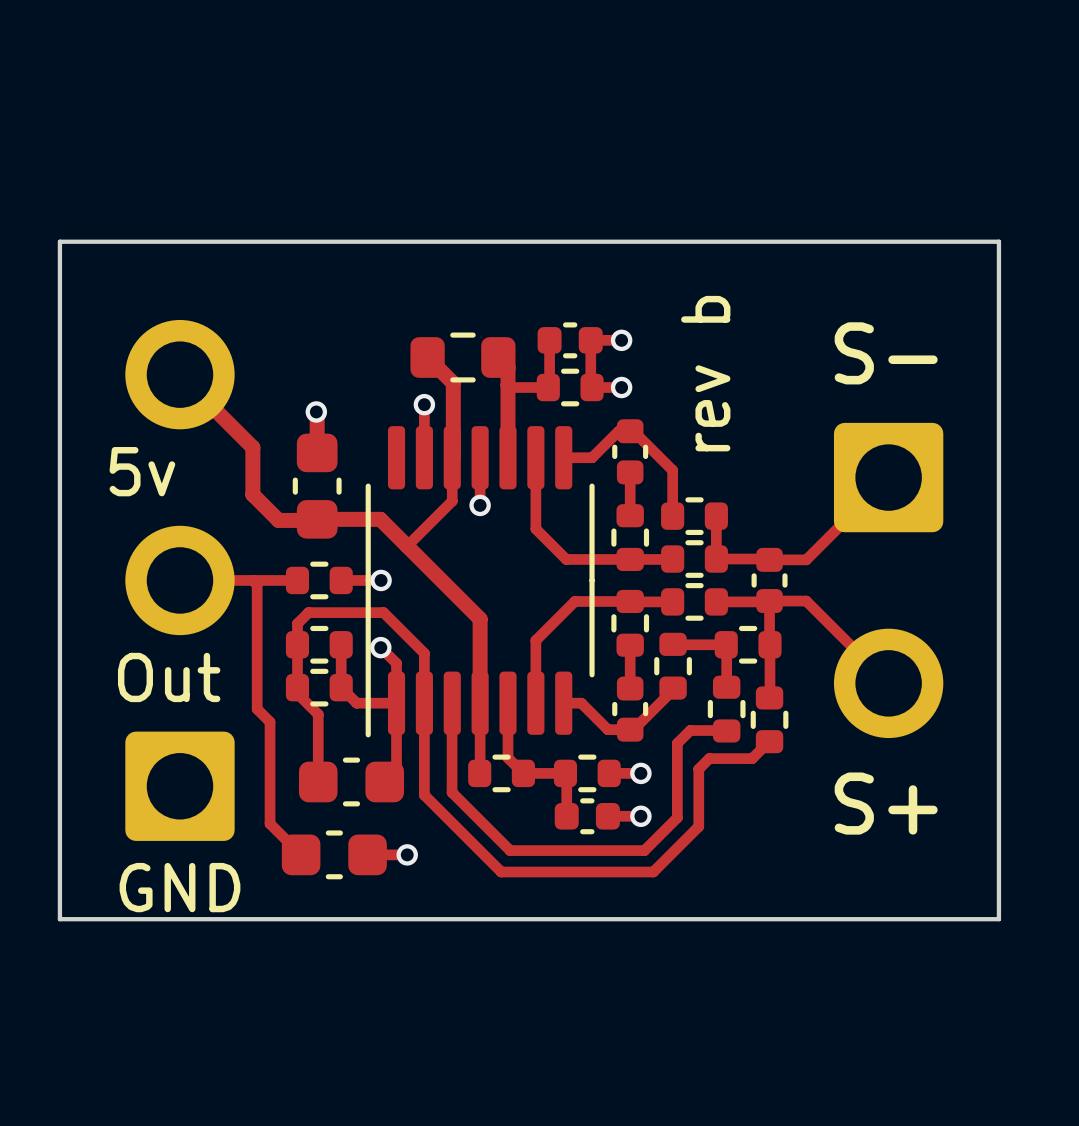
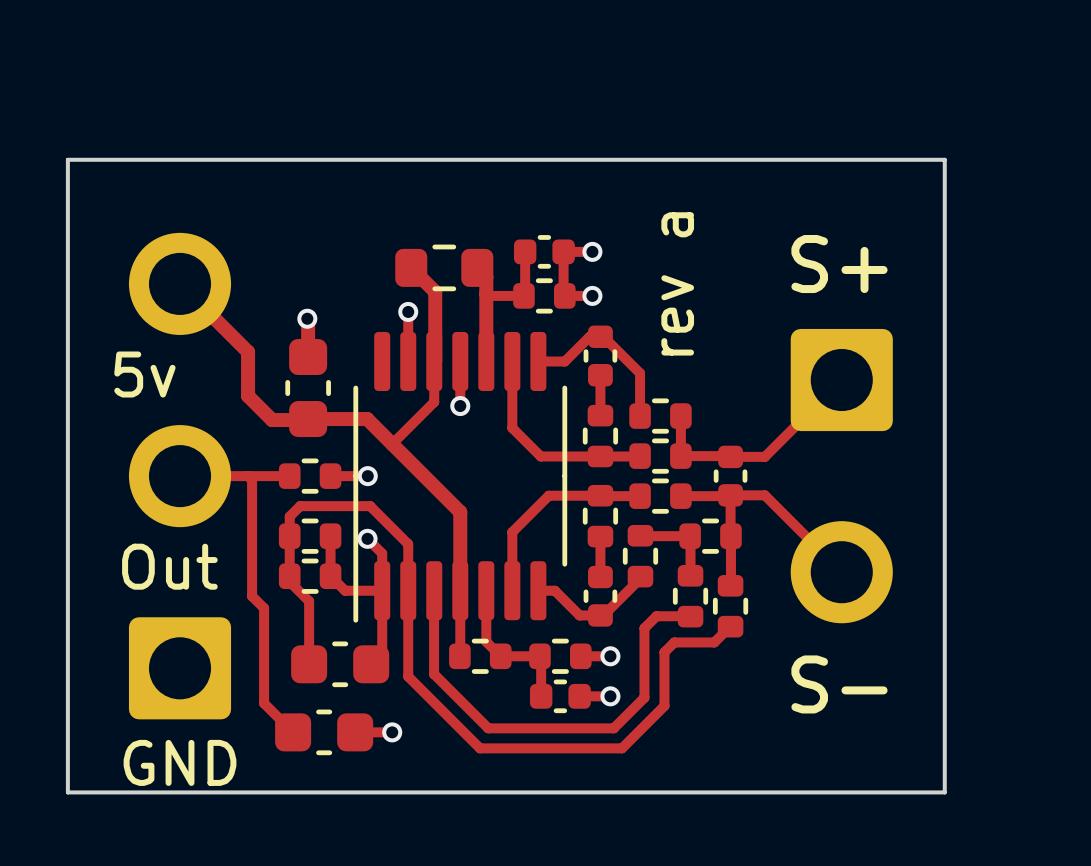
text: S- (886, 353) -> S+ (839, 264)
text: rev b (705, 373) -> rev a (677, 283)
text: S+ (886, 803) -> S- (839, 684)

